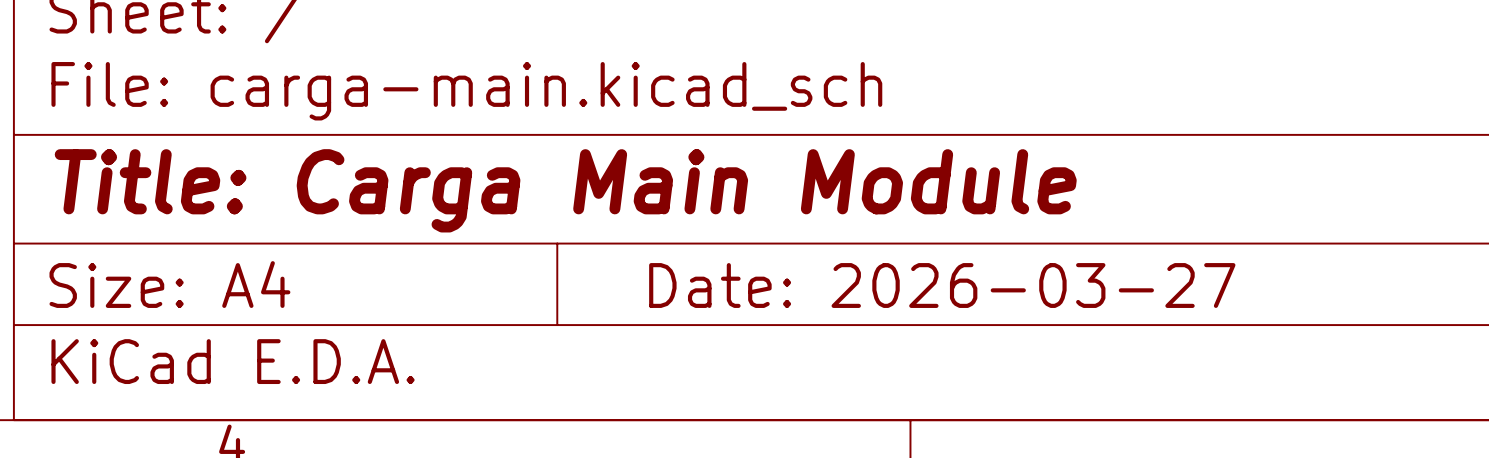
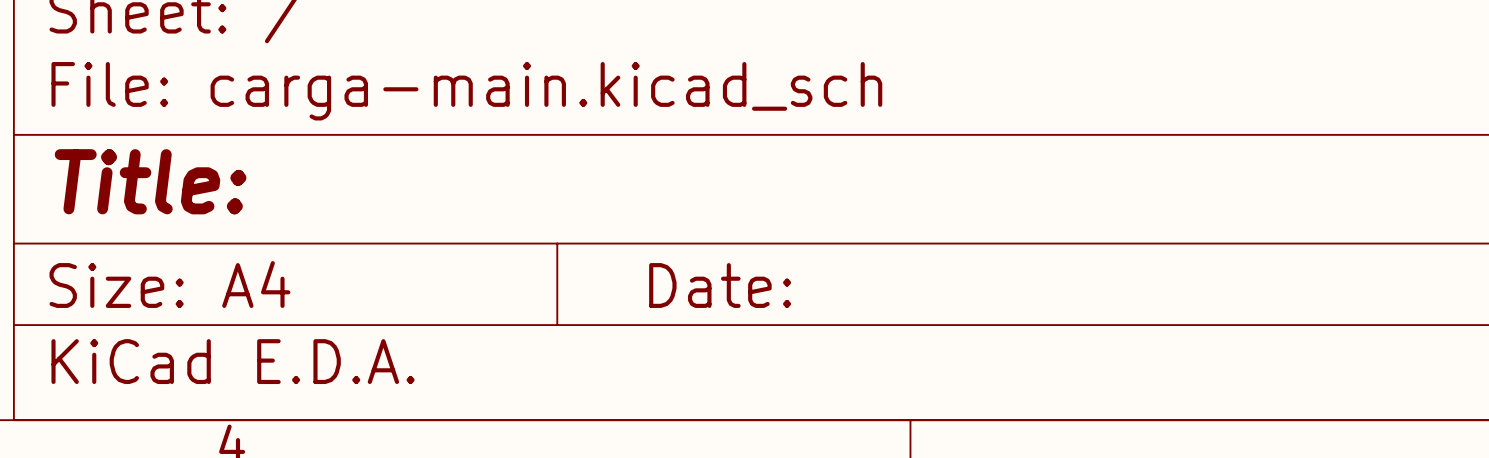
title block: Title: Carga Main Module (565, 190) -> Title: (150, 181)
title block: Date: 2026-03-27 (942, 285) -> Date: (720, 285)

